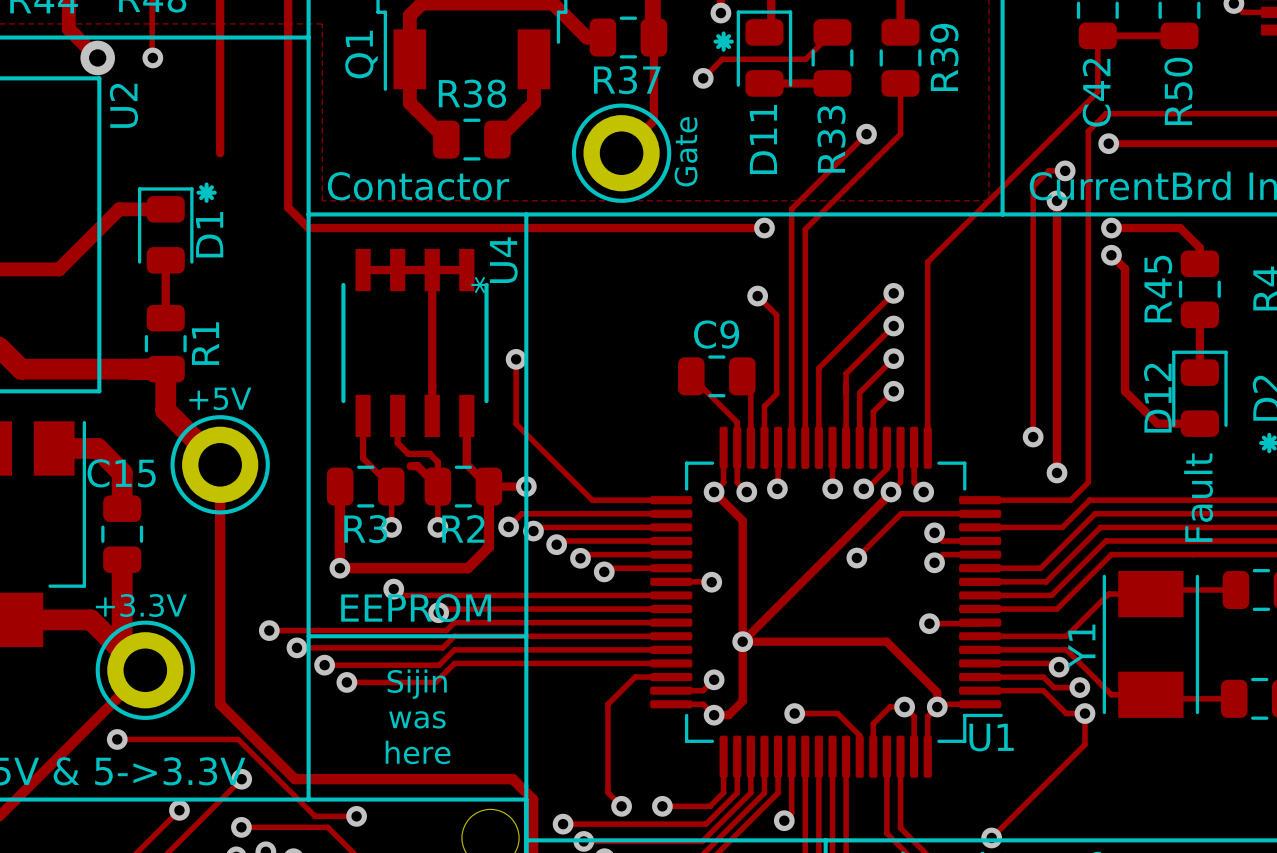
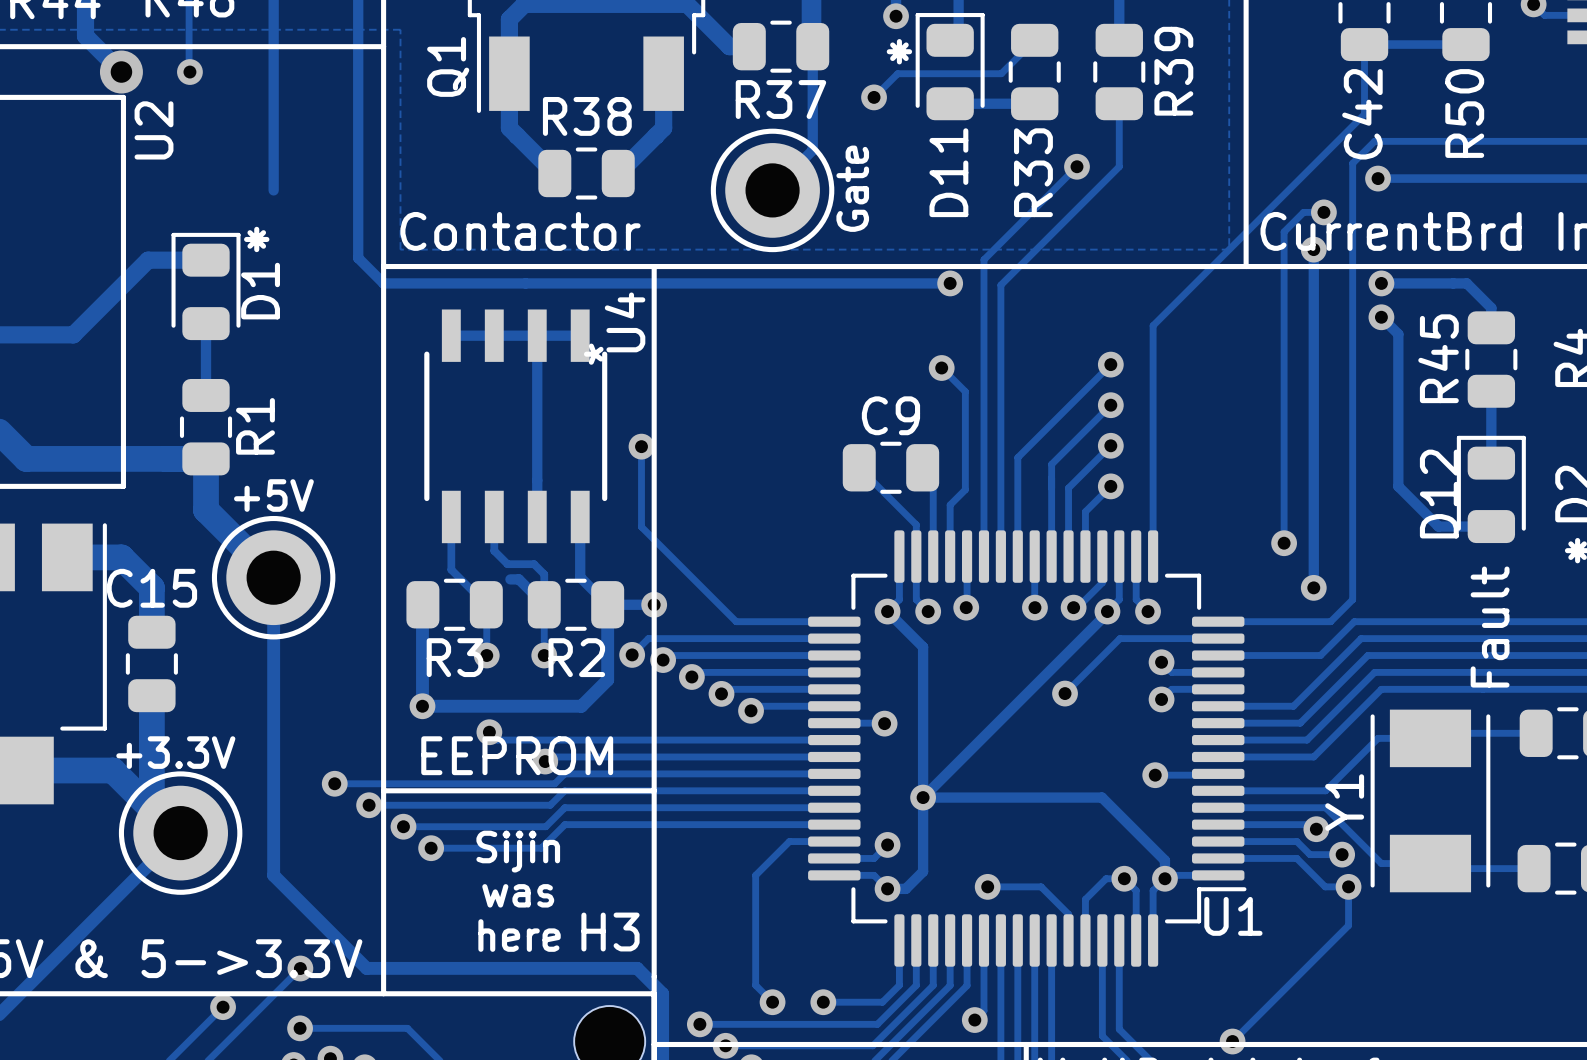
track: (117, 739) (238, 739) (315, 816) (356, 816) -> none
via: (117, 739) -> none
H3 name: none -> H3 (610, 932)
via: (356, 816) -> none

